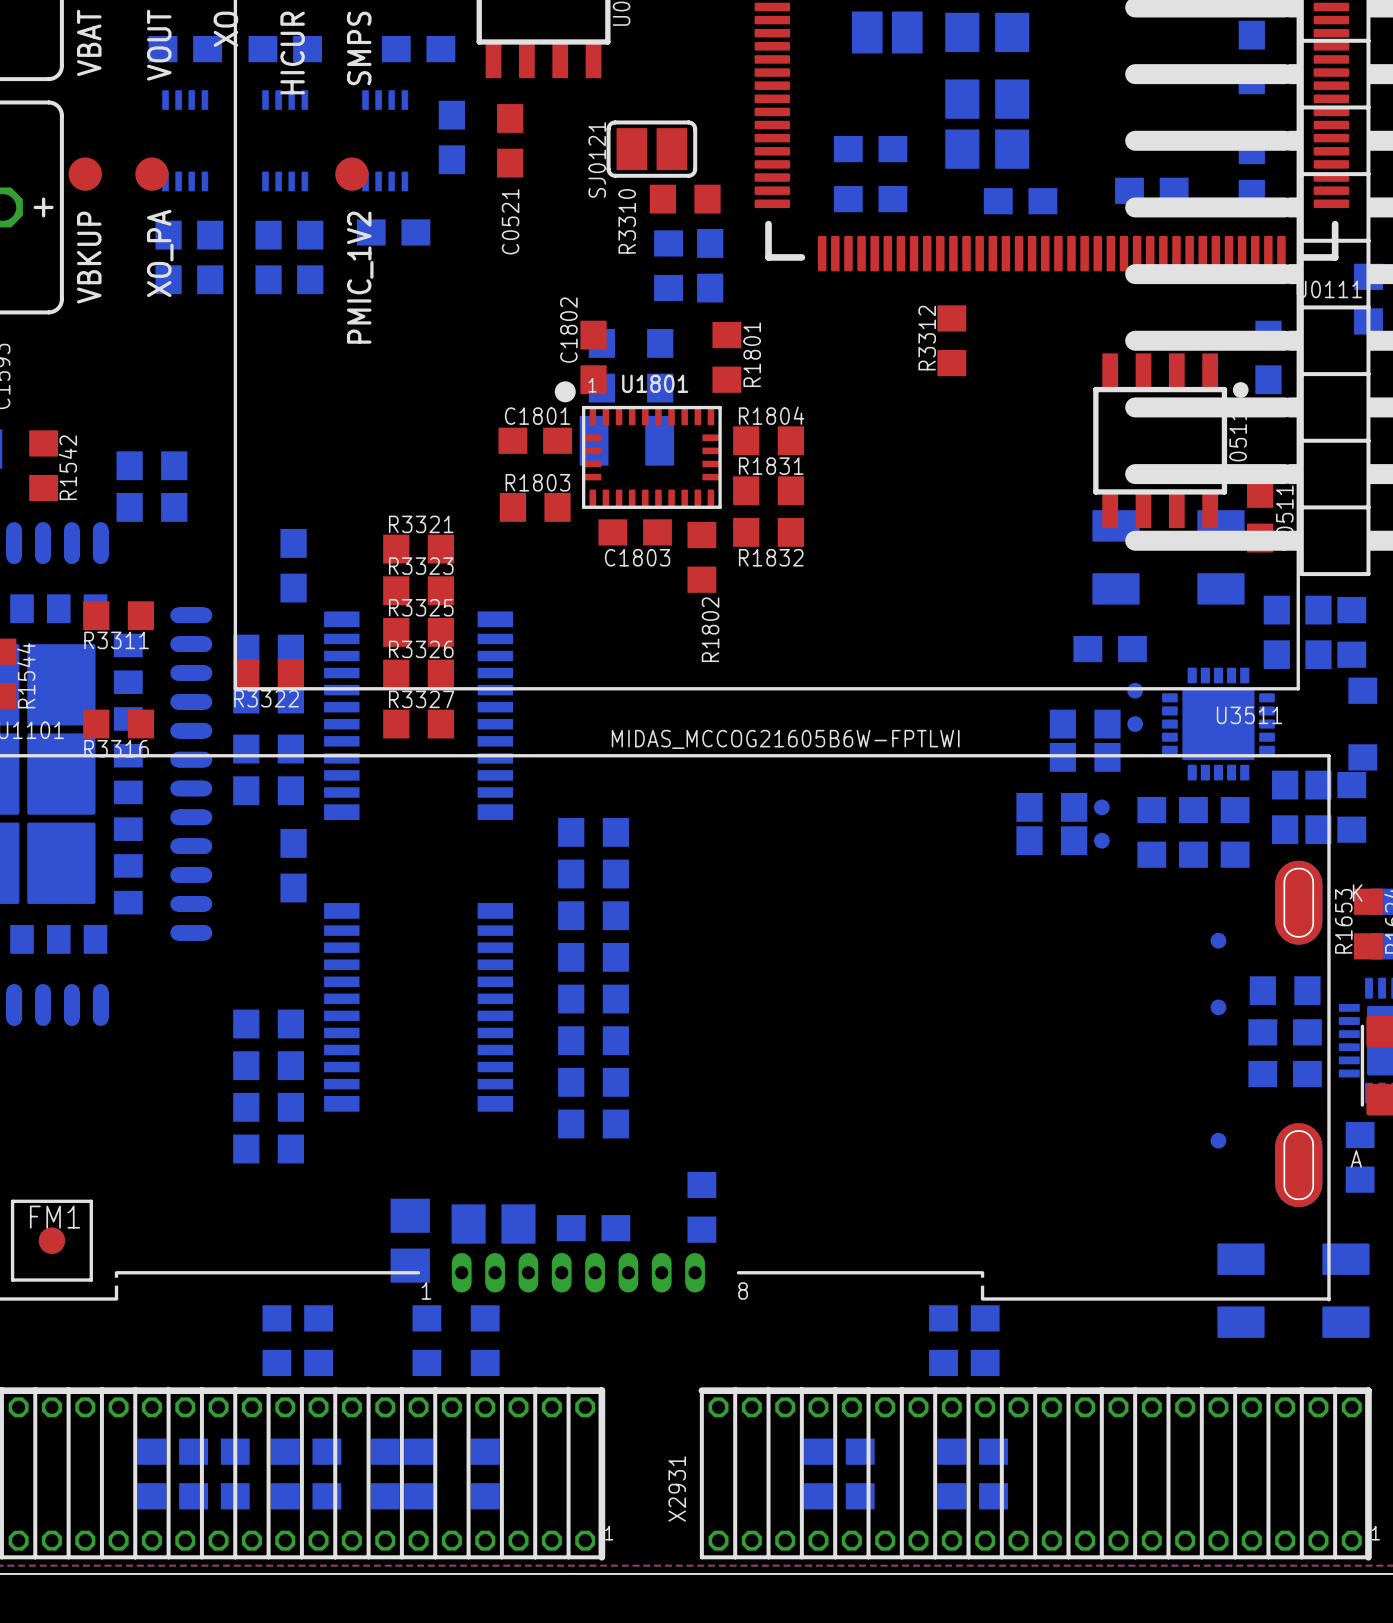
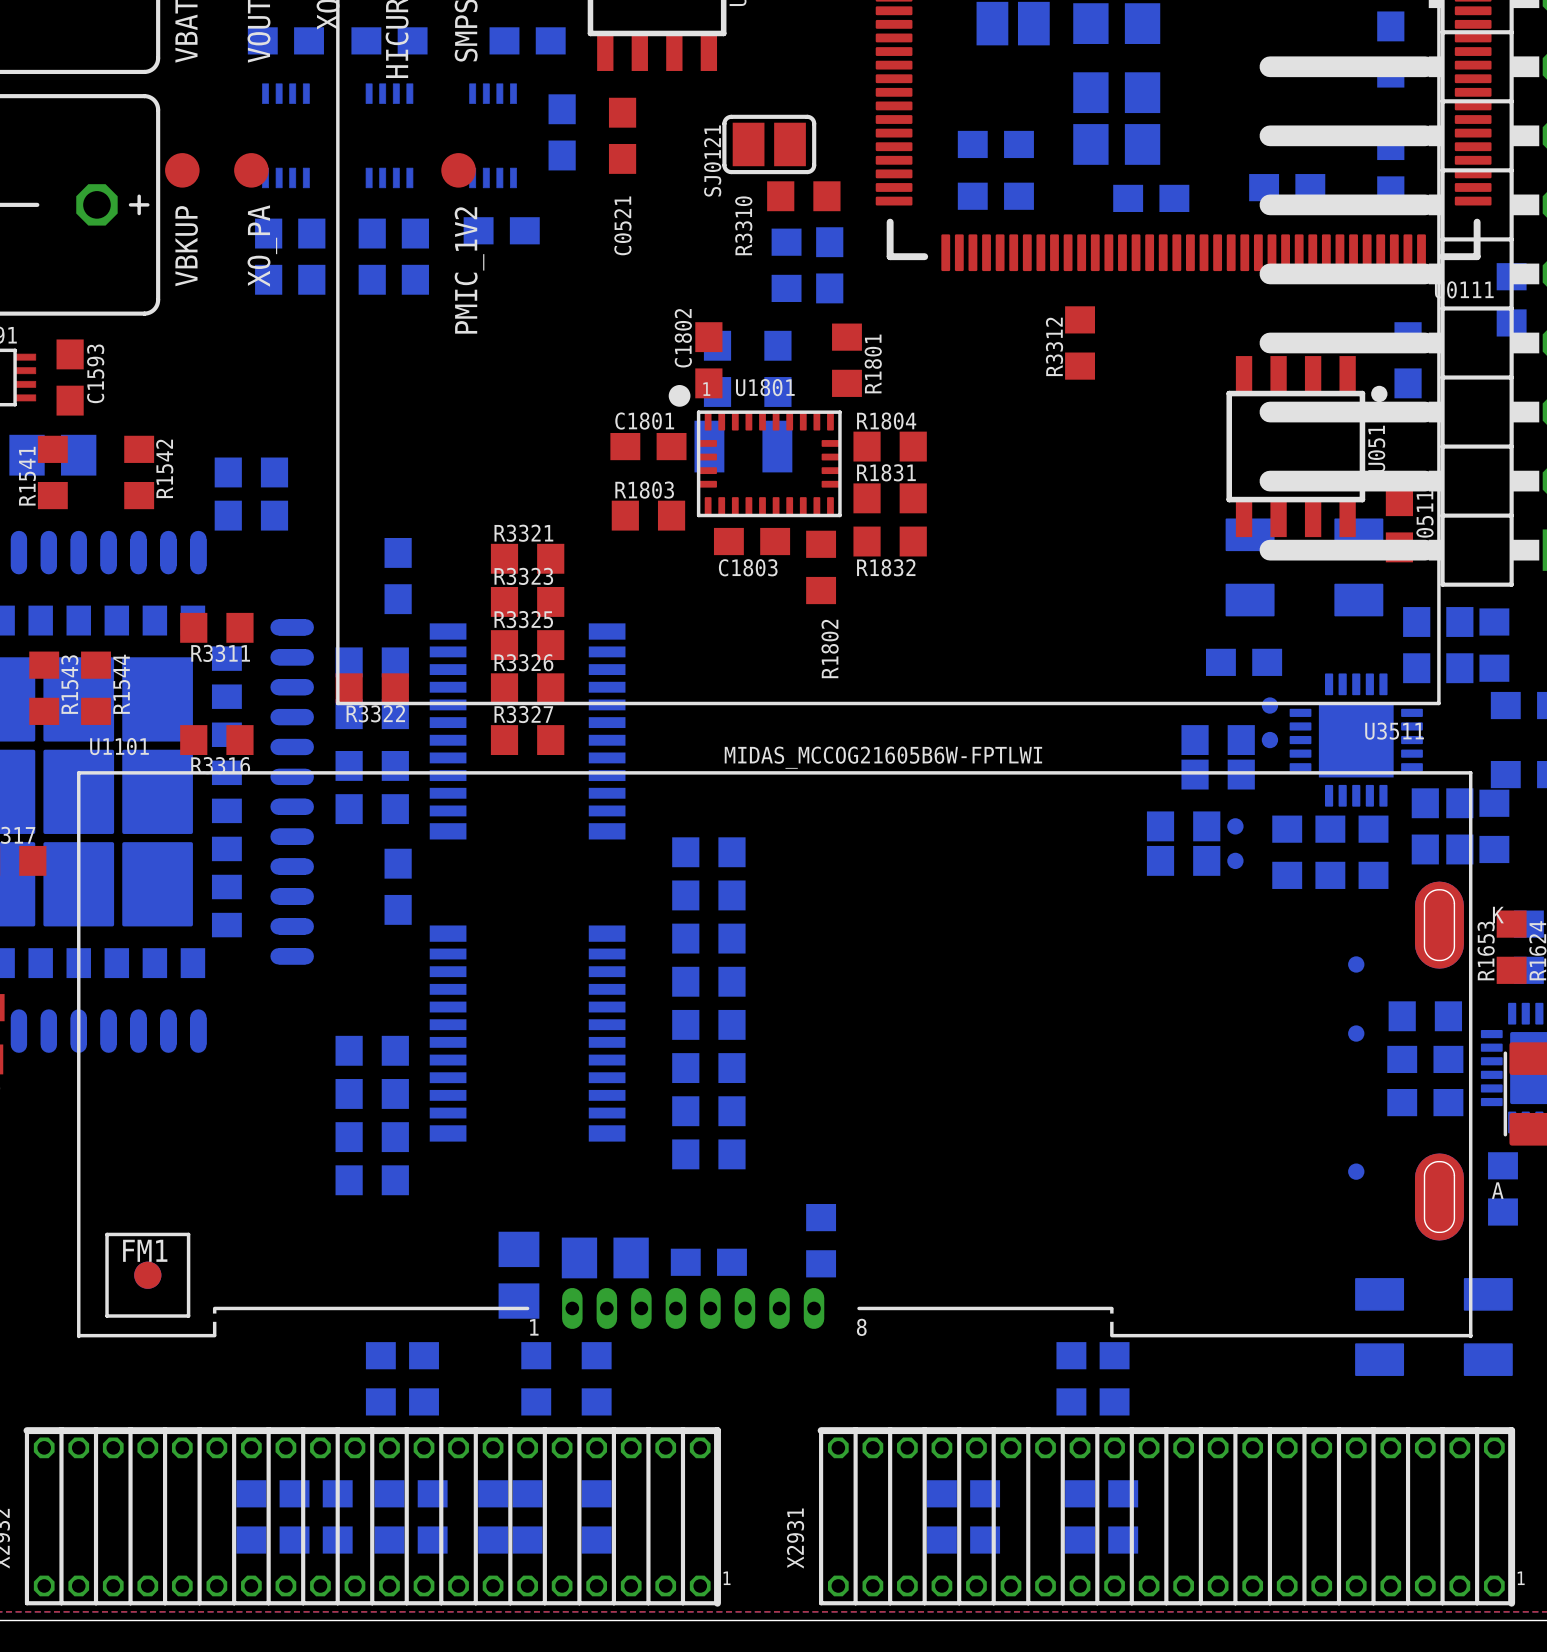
part footprint: [1162, 667, 1275, 781] -> [1289, 673, 1423, 807]

